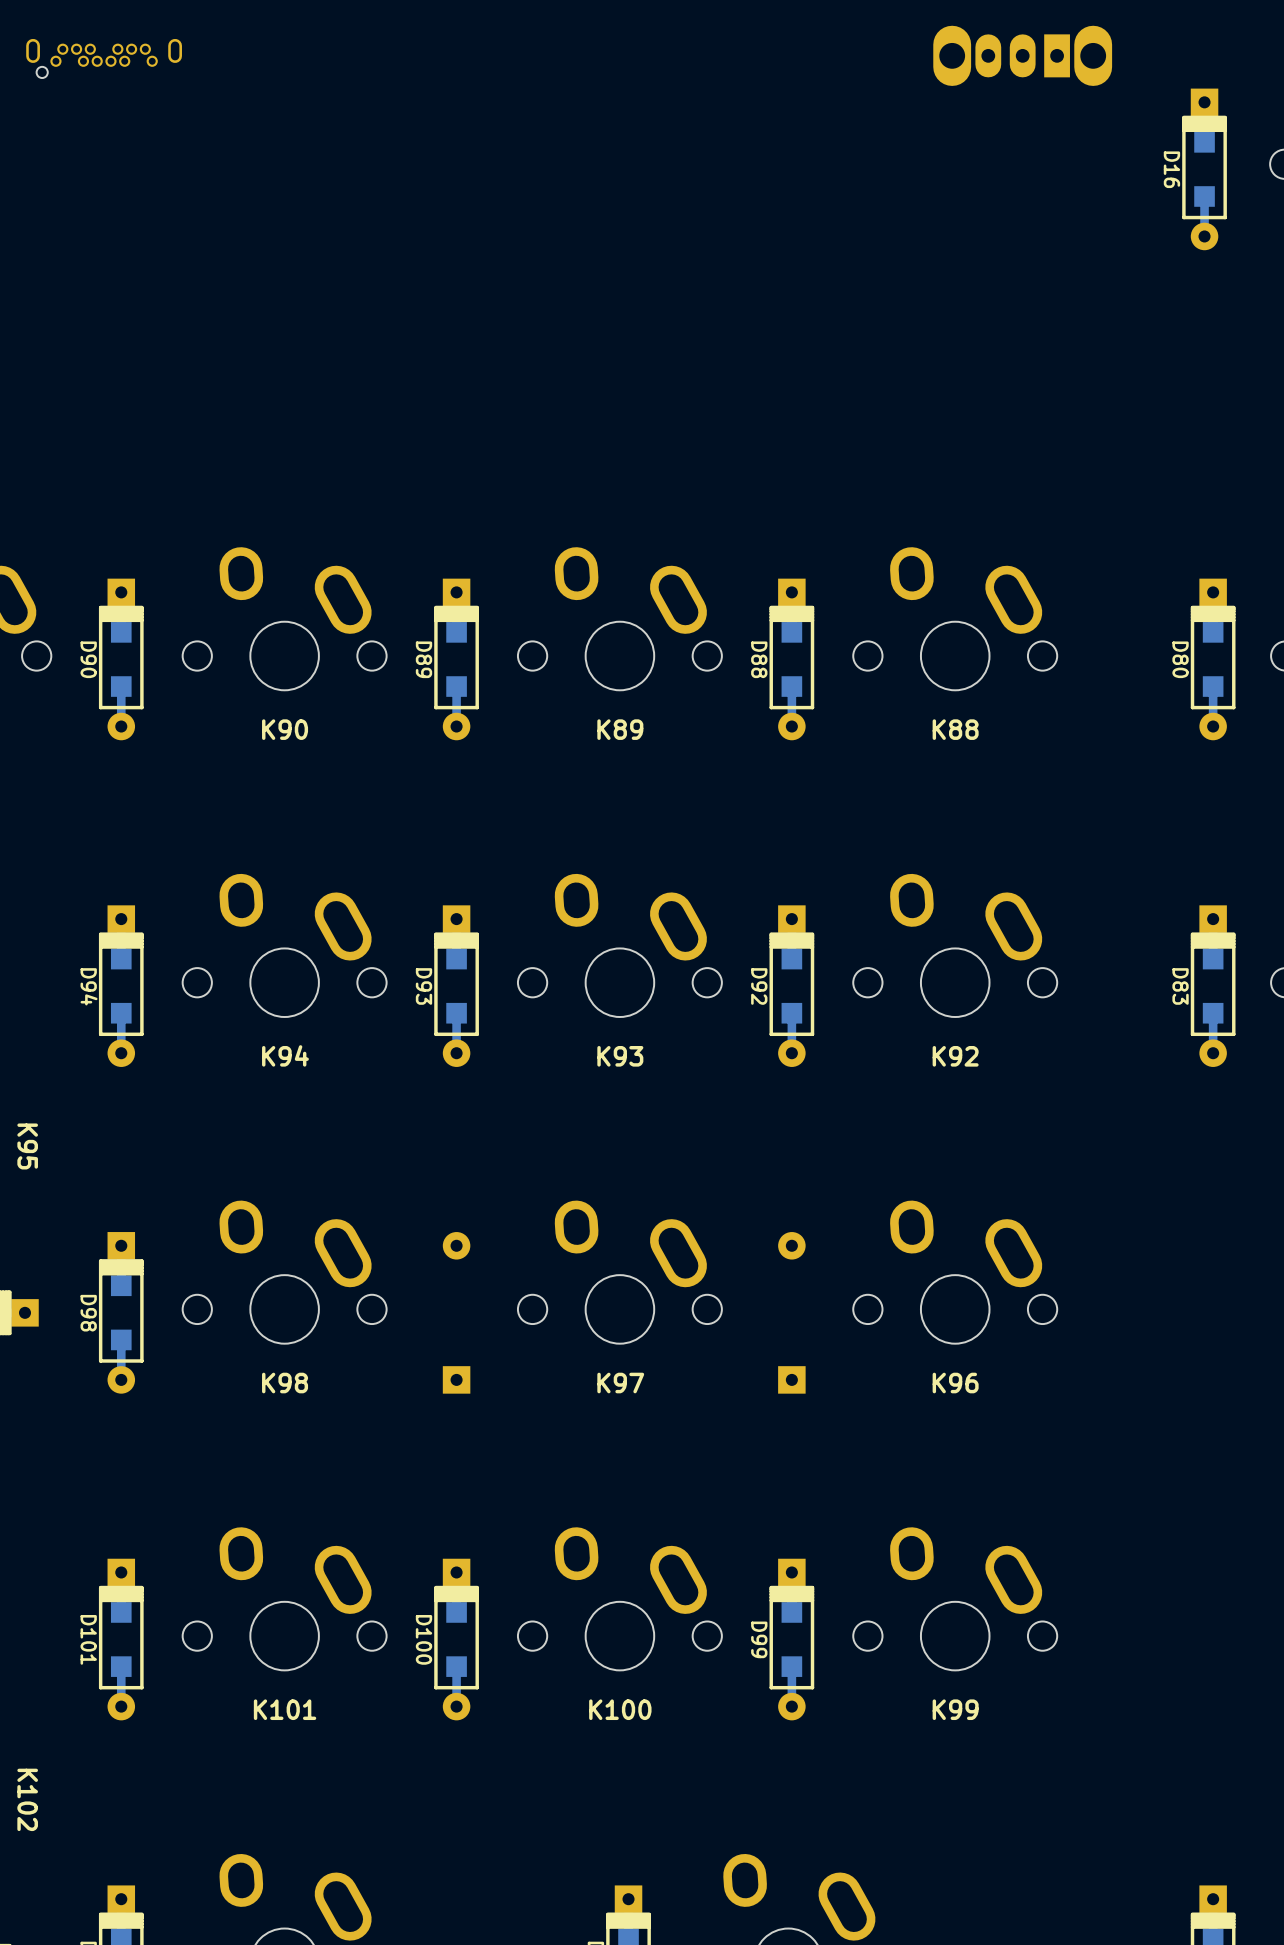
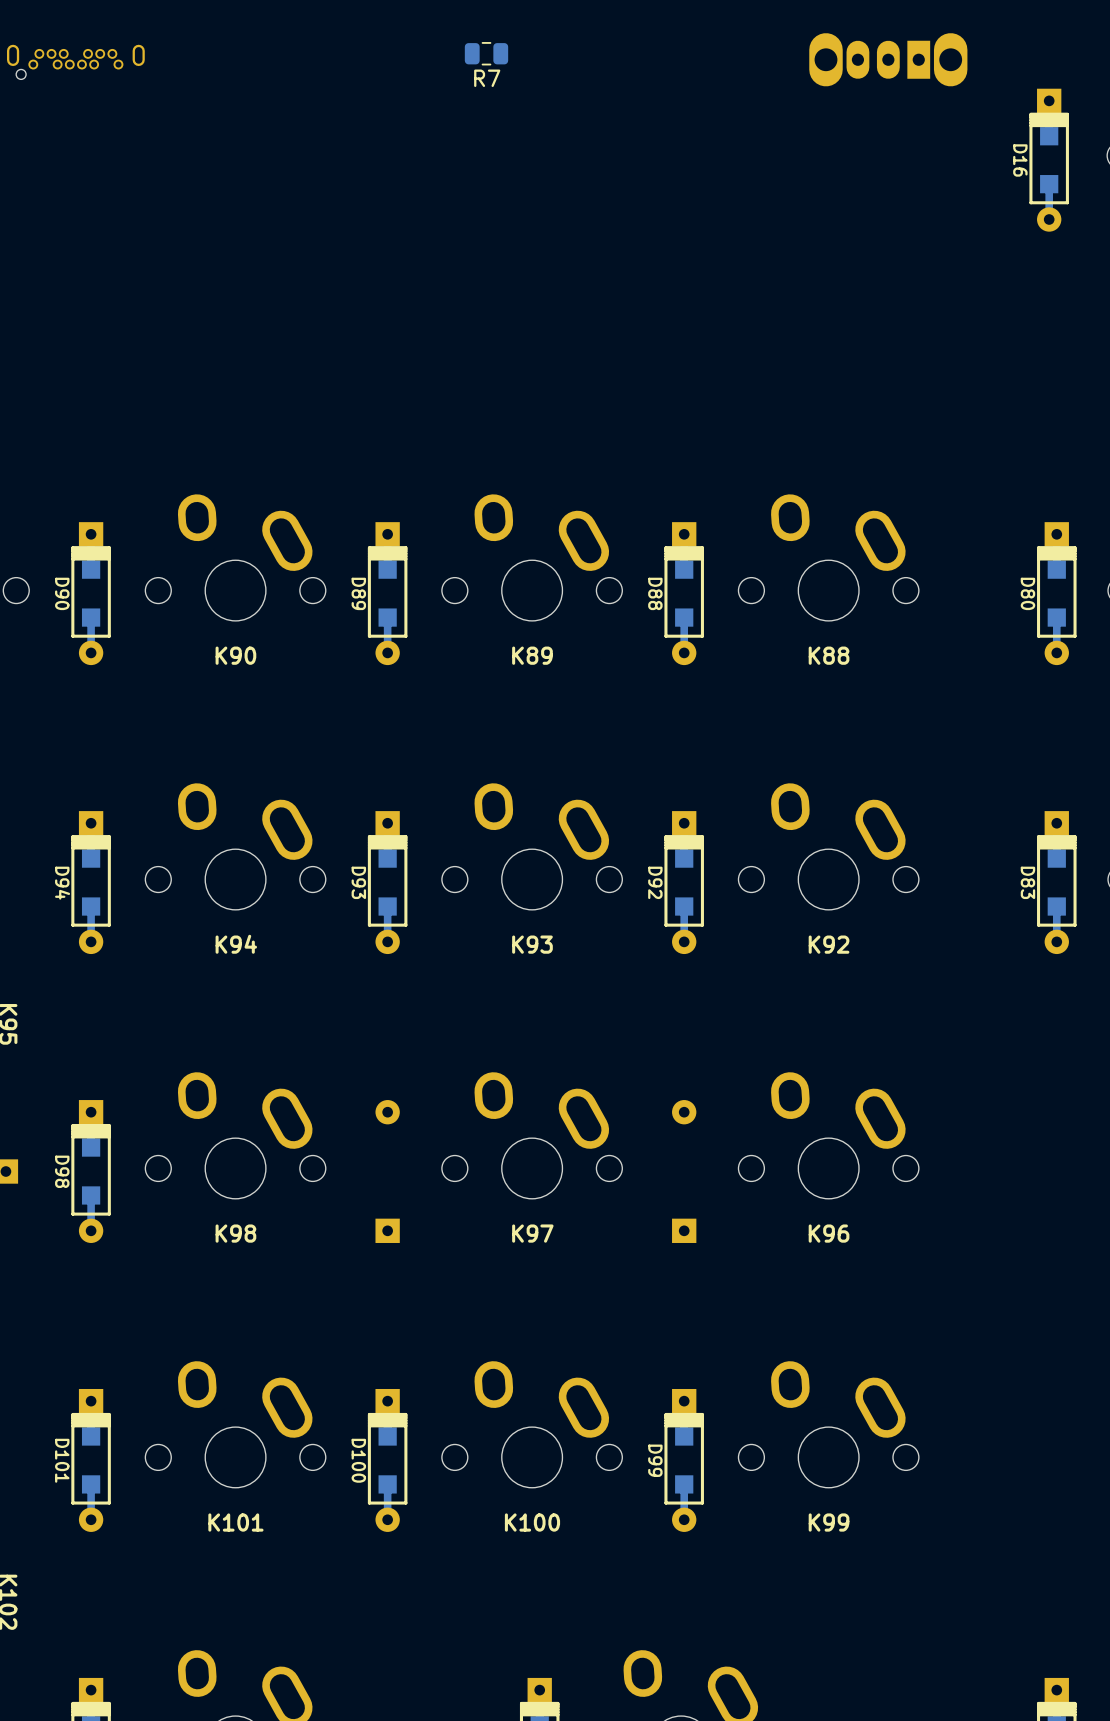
R7: none -> (486, 53)

